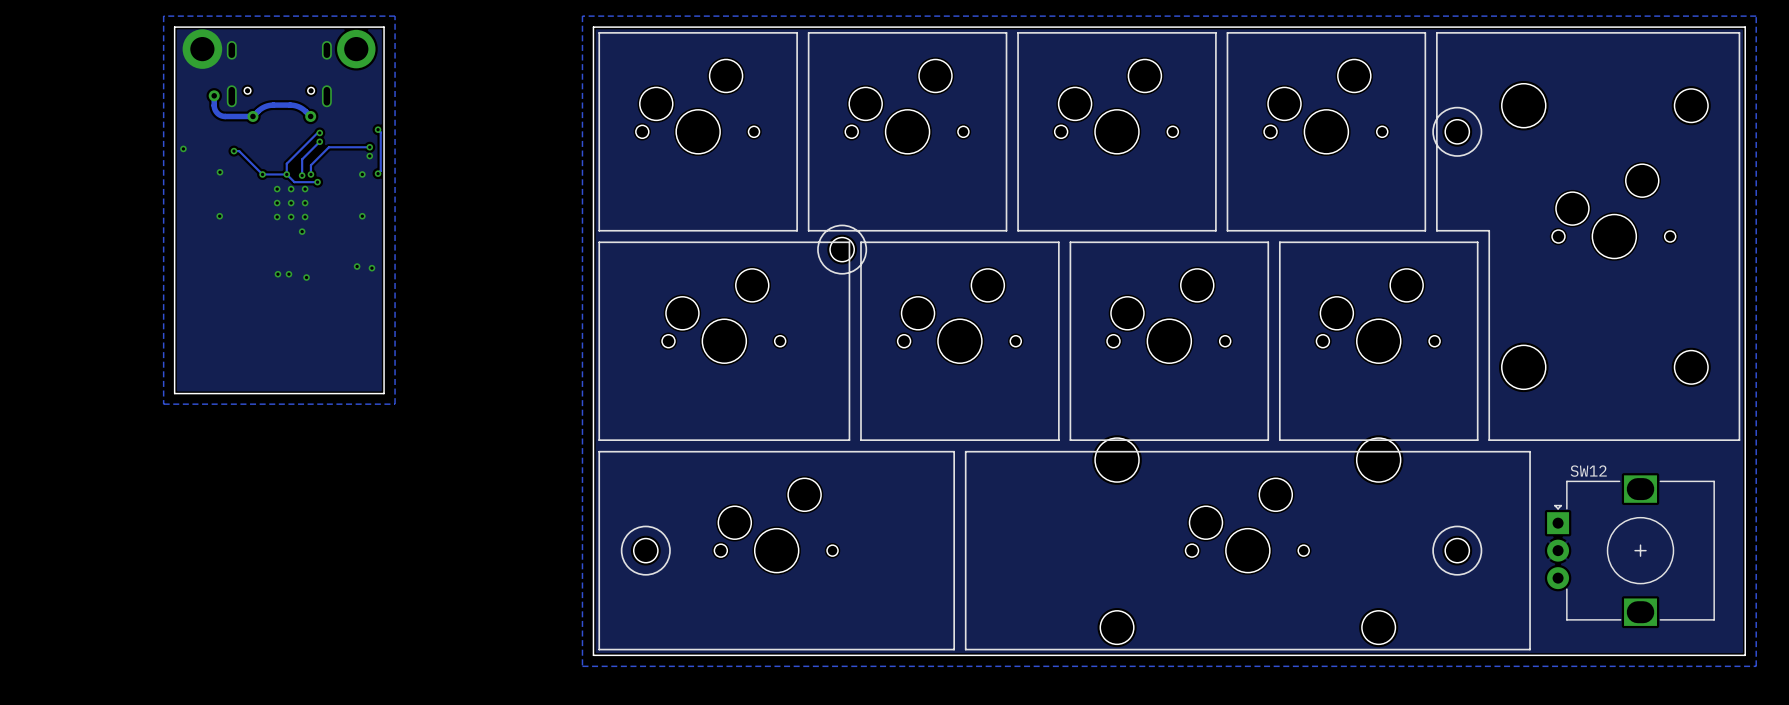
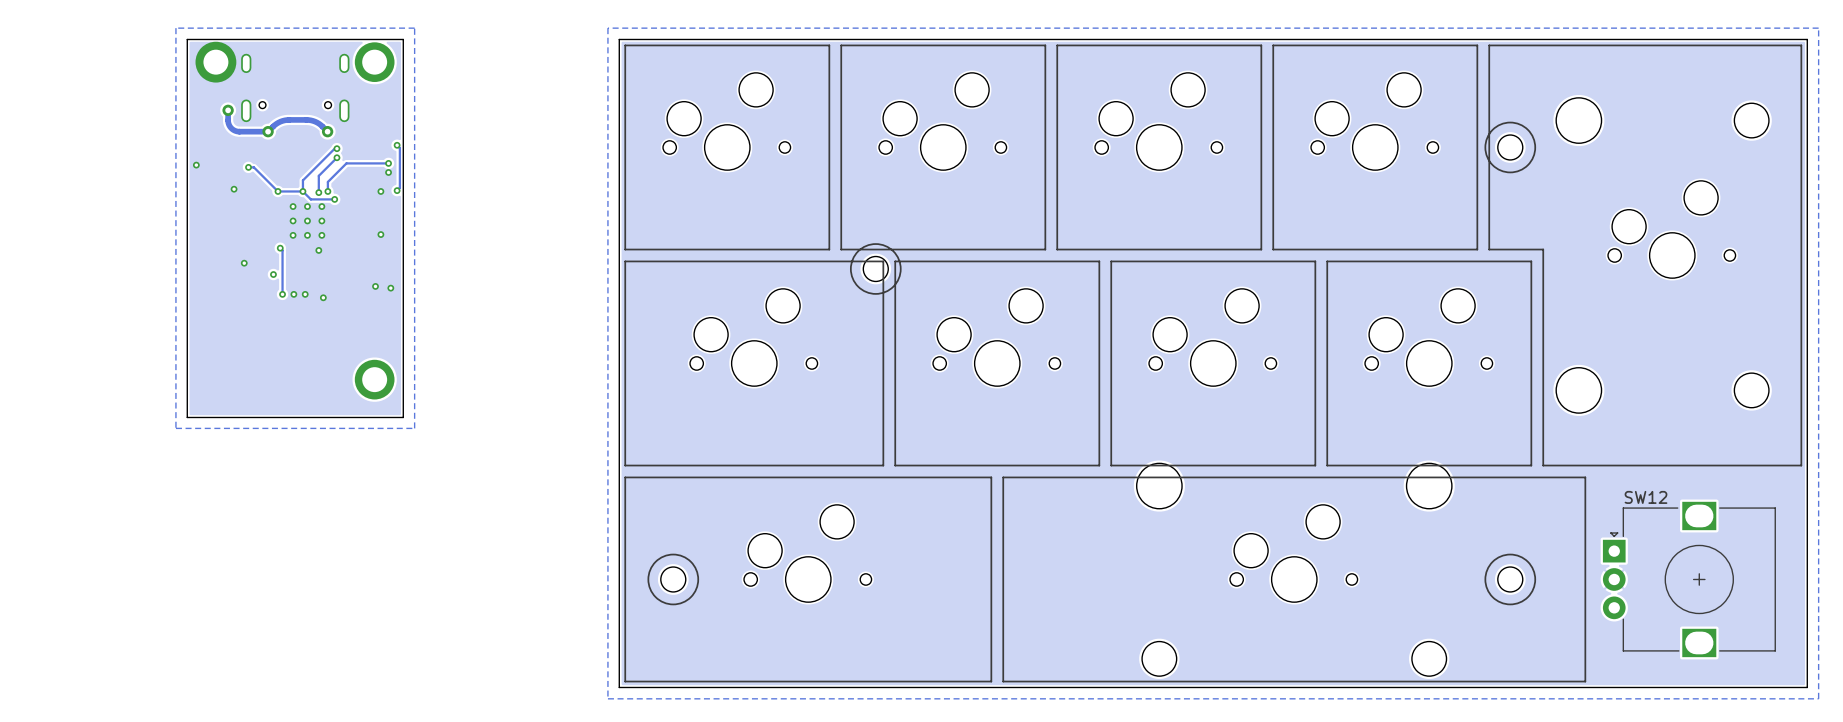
via: (219, 216) -> none
track: none -> (280, 248) (282, 250) (282, 294)
via: none -> (280, 248)
via: none -> (244, 263)
via: none -> (273, 274)
via: none -> (282, 294)
part: none -> (374, 379)

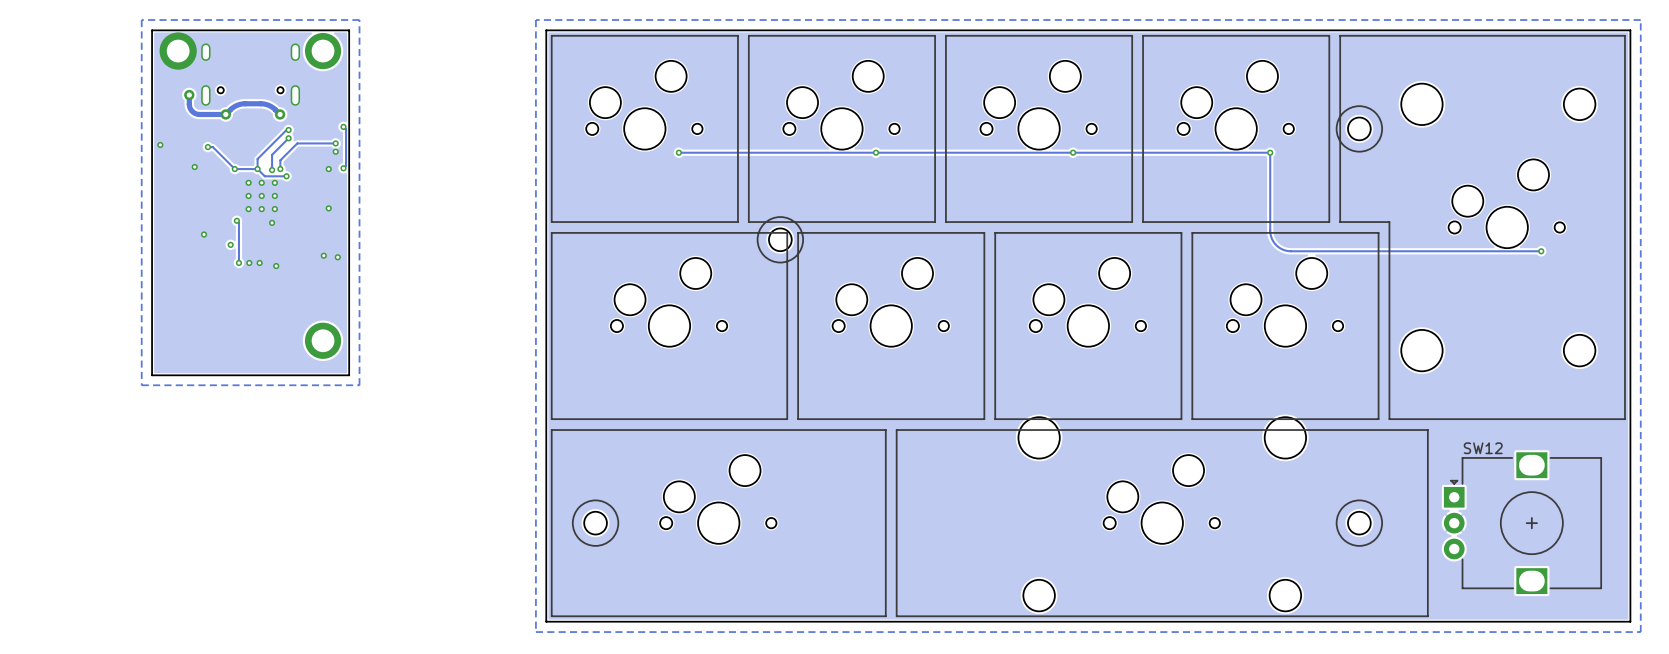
track: none -> (678, 152) (1270, 152) (1270, 232) (1274, 243) (1284, 250) (1541, 251)
via: none -> (678, 152)
via: none -> (875, 152)
via: none -> (1073, 152)
via: none -> (1270, 152)
via: none -> (1541, 251)

